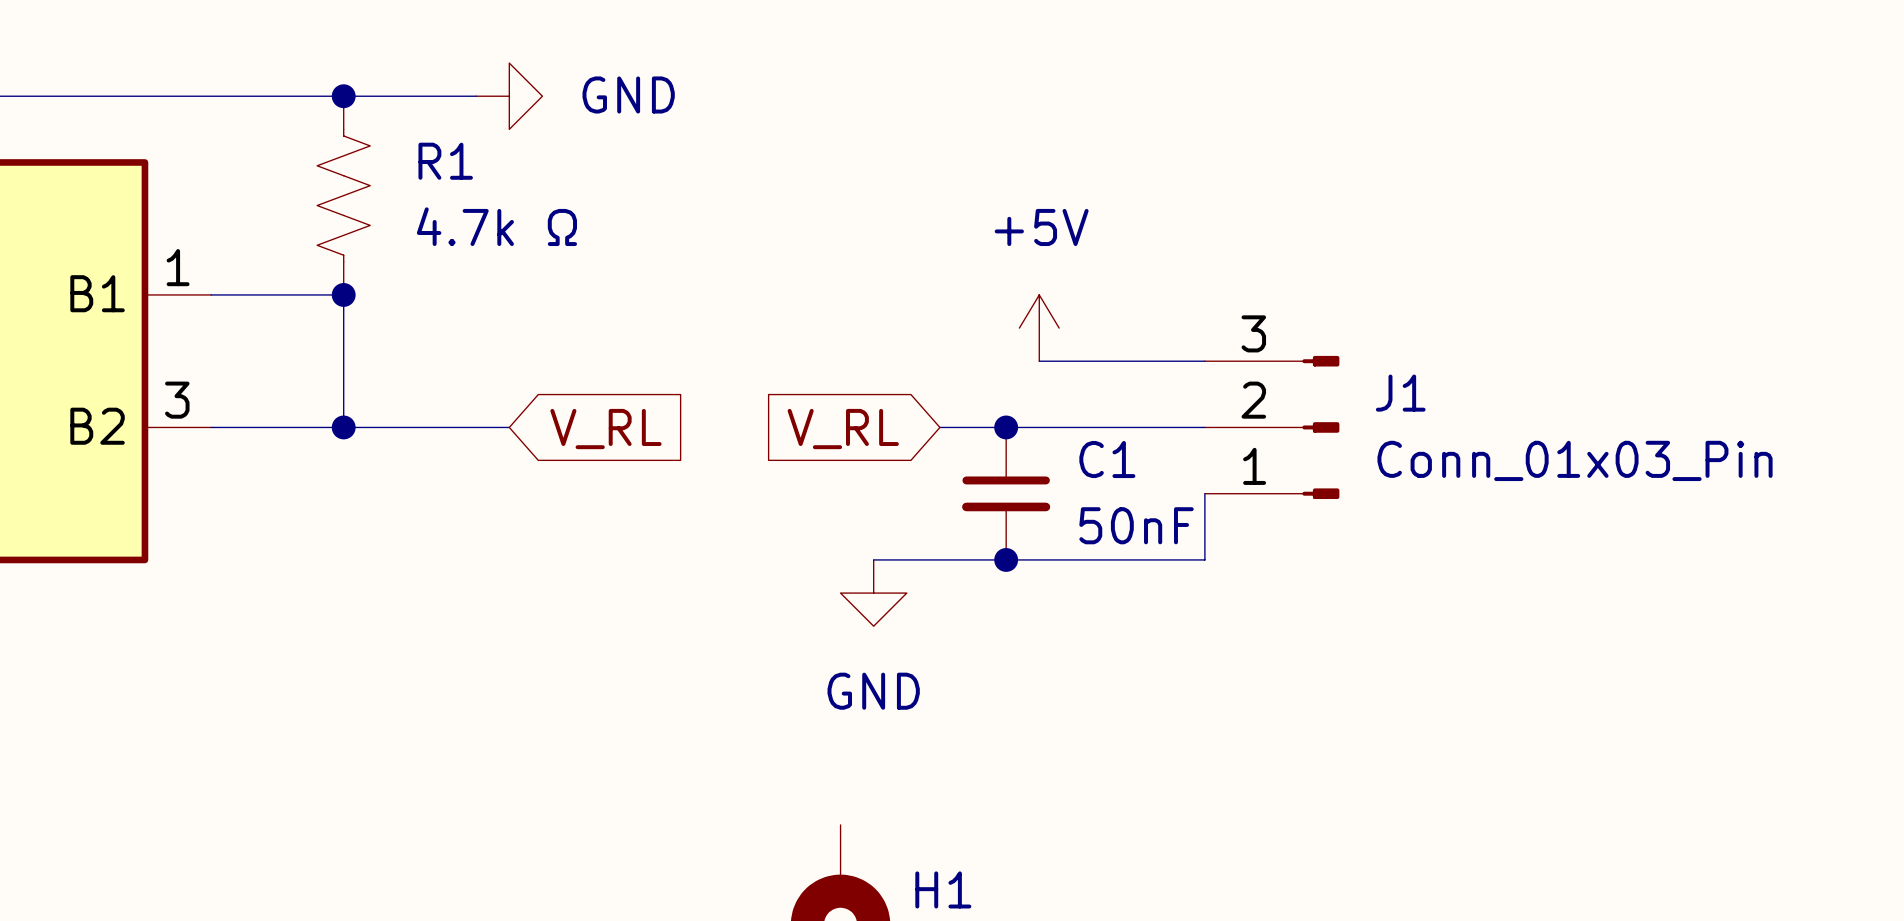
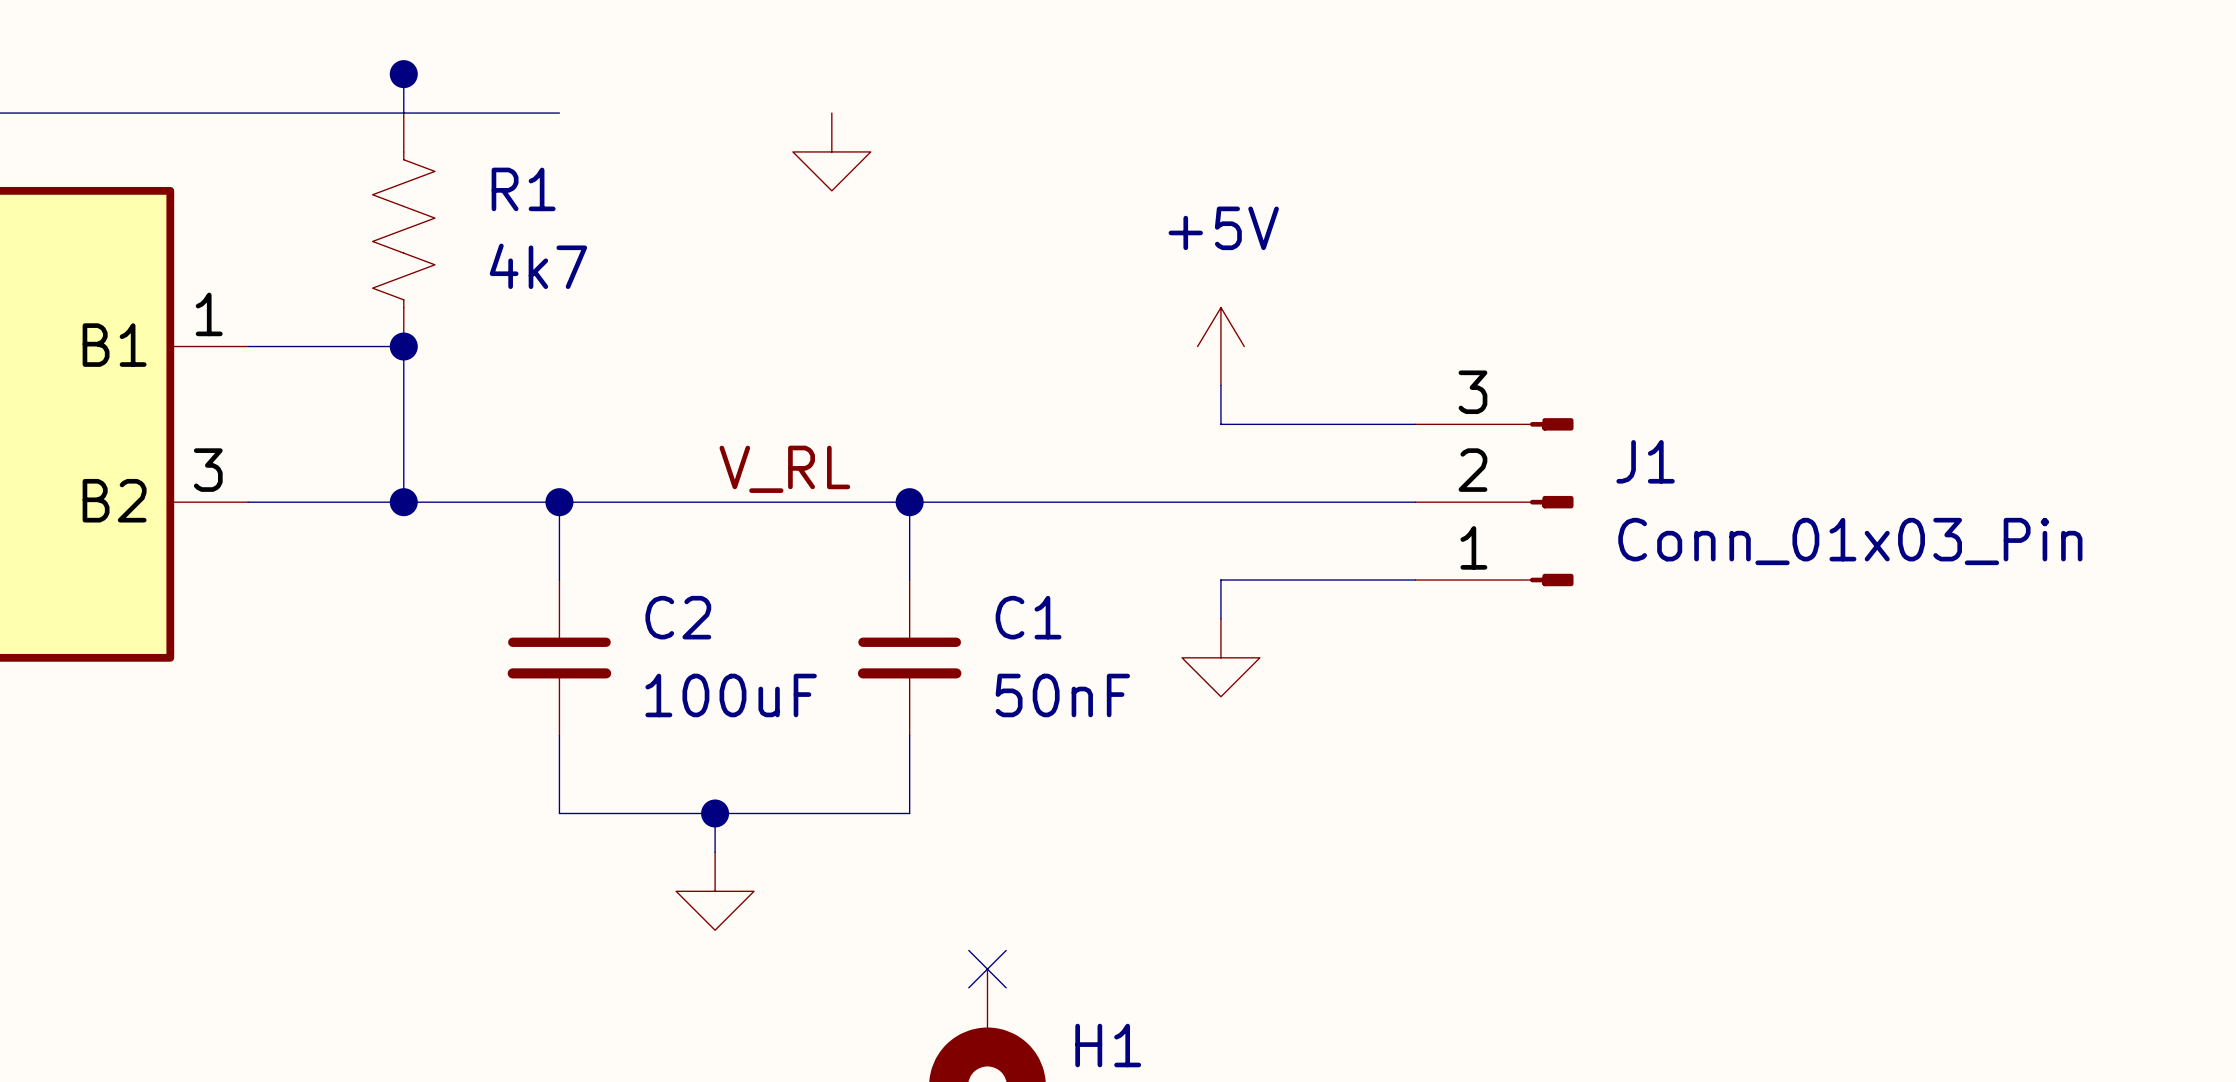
wire: none -> (403, 74) (403, 113)
junction position: (343, 96) -> (403, 74)
power symbol: GND (509, 96) -> none
power symbol: none -> (831, 151)
R1 value: 4.7k Ω (496, 226) -> 4k7 (538, 266)
power symbol position: +5V (1039, 328) -> +5V (1220, 346)
label: none -> V_RL (784, 469)
wire: none -> (559, 502) (559, 580)
junction: none -> (559, 502)
wire: none -> (598, 502) (1104, 502)
wire: none -> (909, 502) (909, 580)
junction: none -> (909, 502)
junction: (1006, 427) -> none
global label: V_RL (605, 429) -> none
global label: V_RL (843, 429) -> none
C1 position: (1006, 493) -> (909, 657)
wire: (1204, 493) (1204, 559) (873, 559) -> (1415, 580) (1220, 580) (1220, 618)
C2: none -> 100uF (559, 657)
junction: (1006, 559) -> none
power symbol: none -> (1220, 657)
power symbol: GND (873, 593) -> none
wire: none -> (559, 735) (559, 813) (909, 813) (909, 735)
wire: none -> (715, 813) (715, 852)
junction: none -> (715, 813)
power symbol: none -> (715, 891)
no-connect mark: none -> (987, 969)

